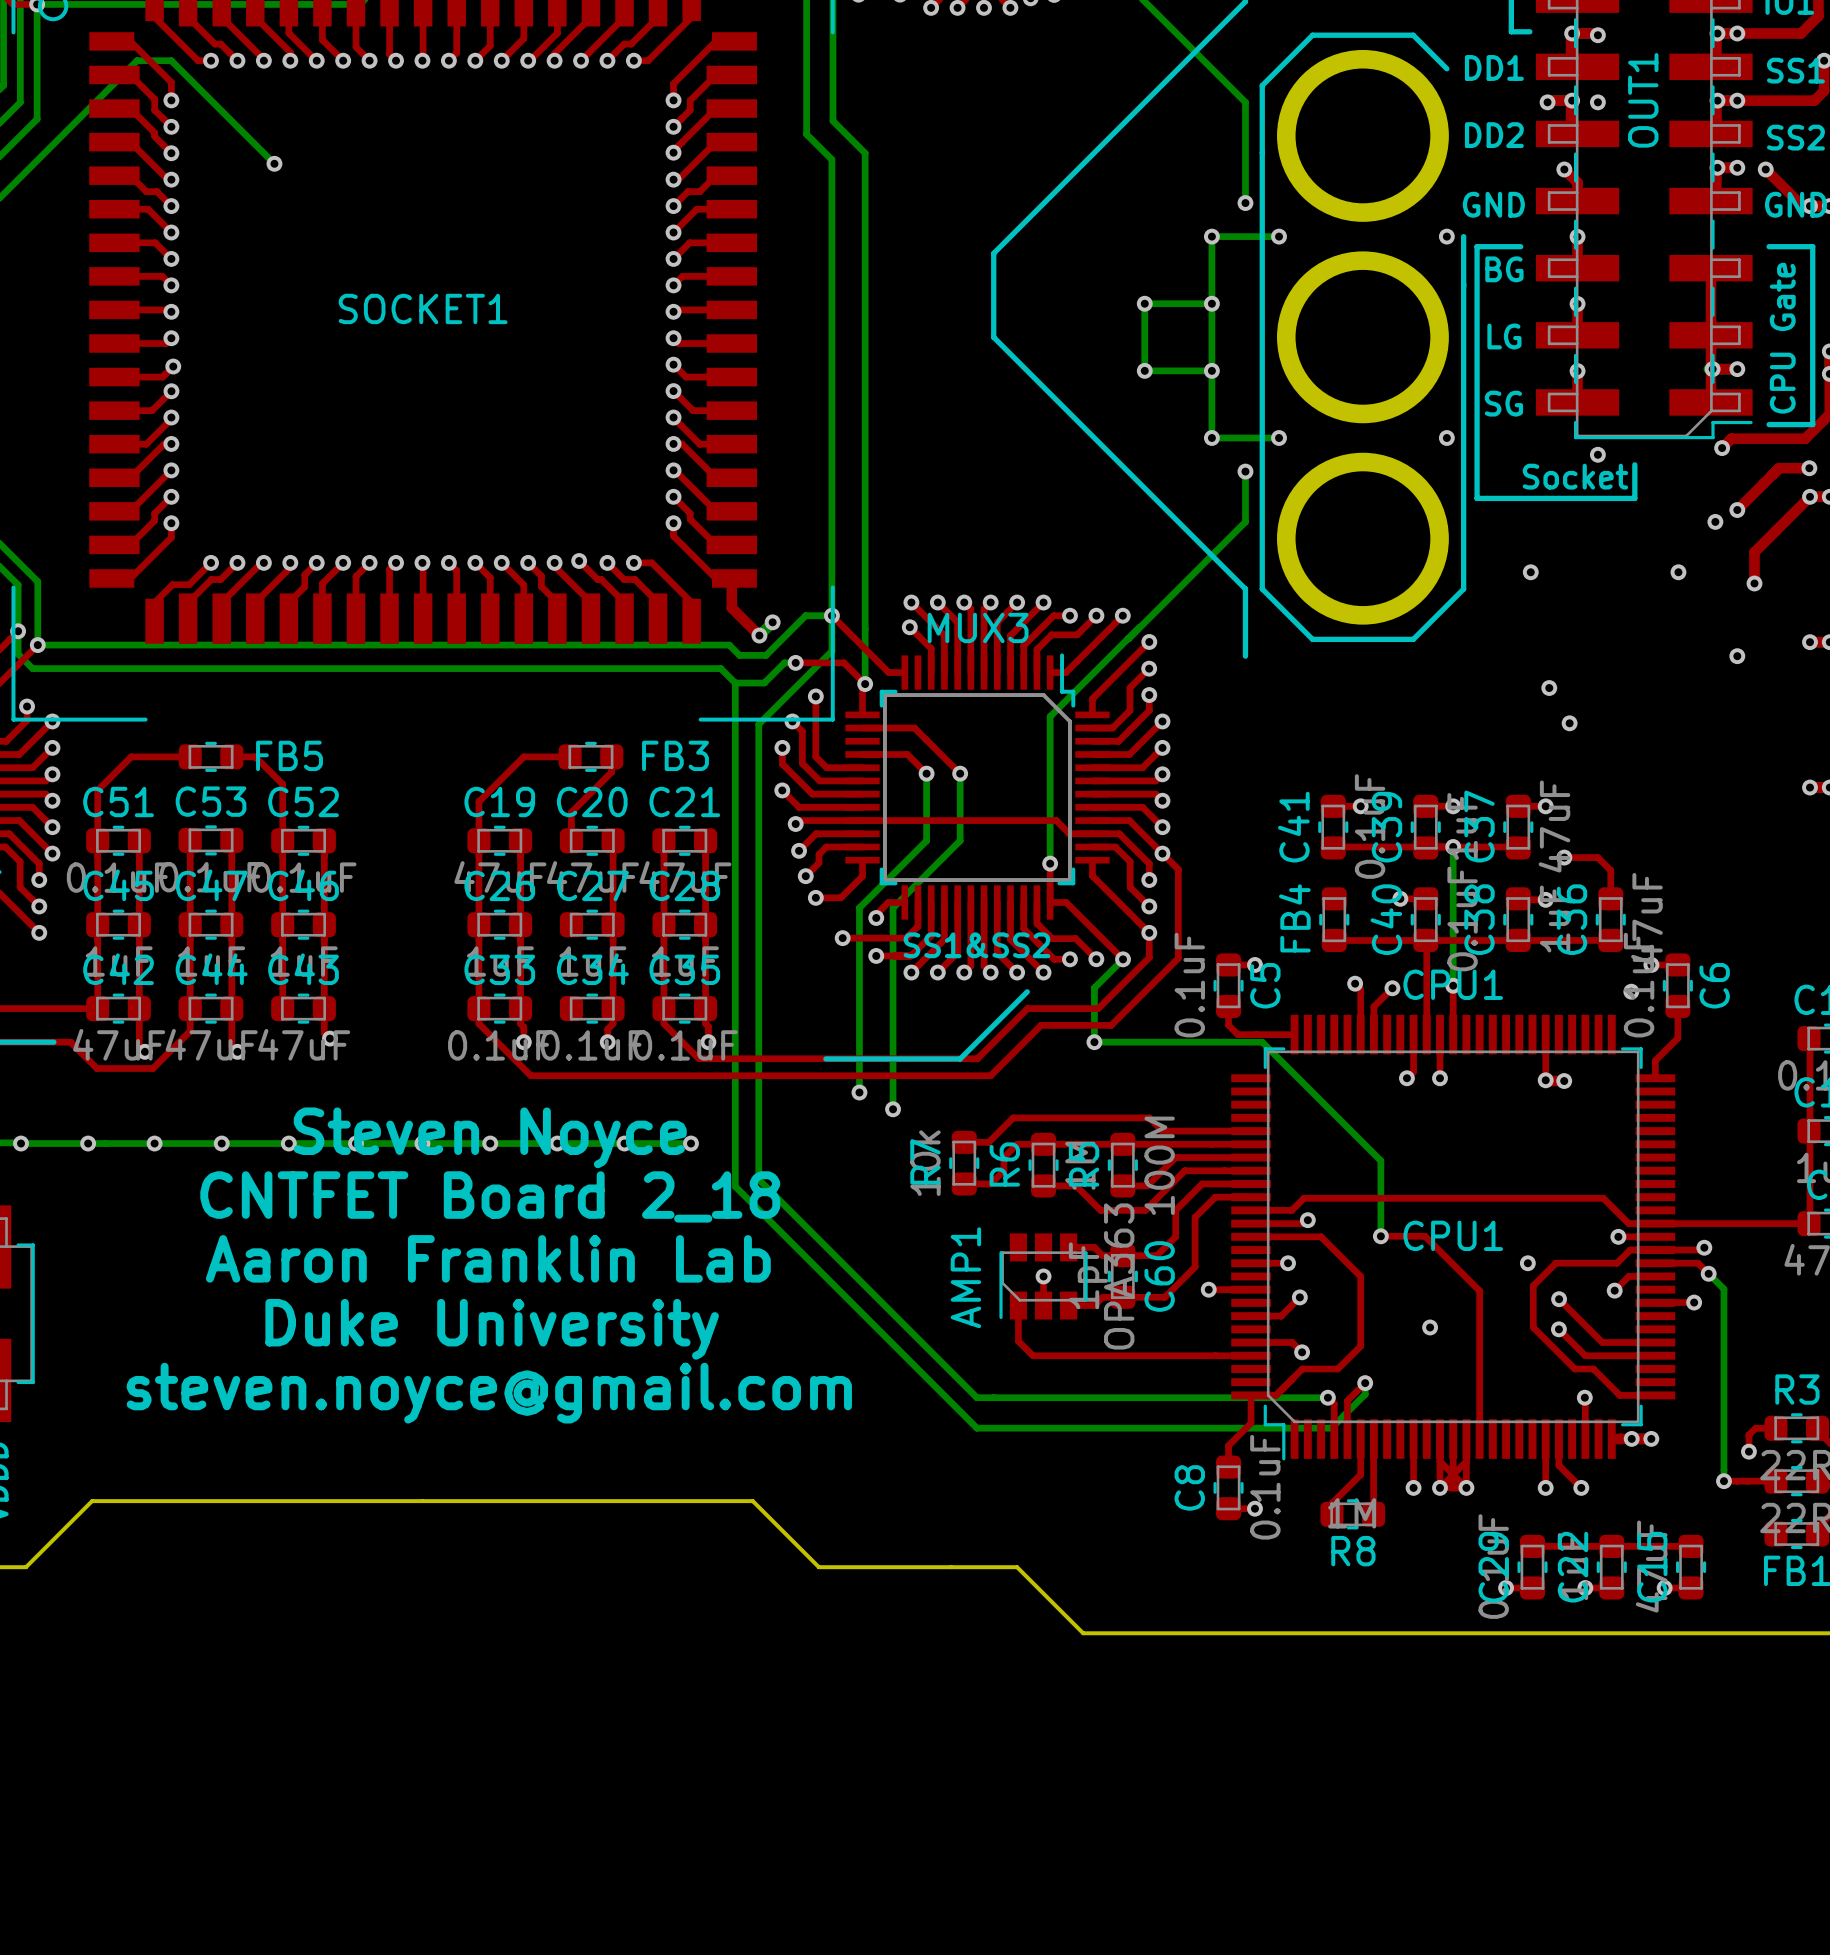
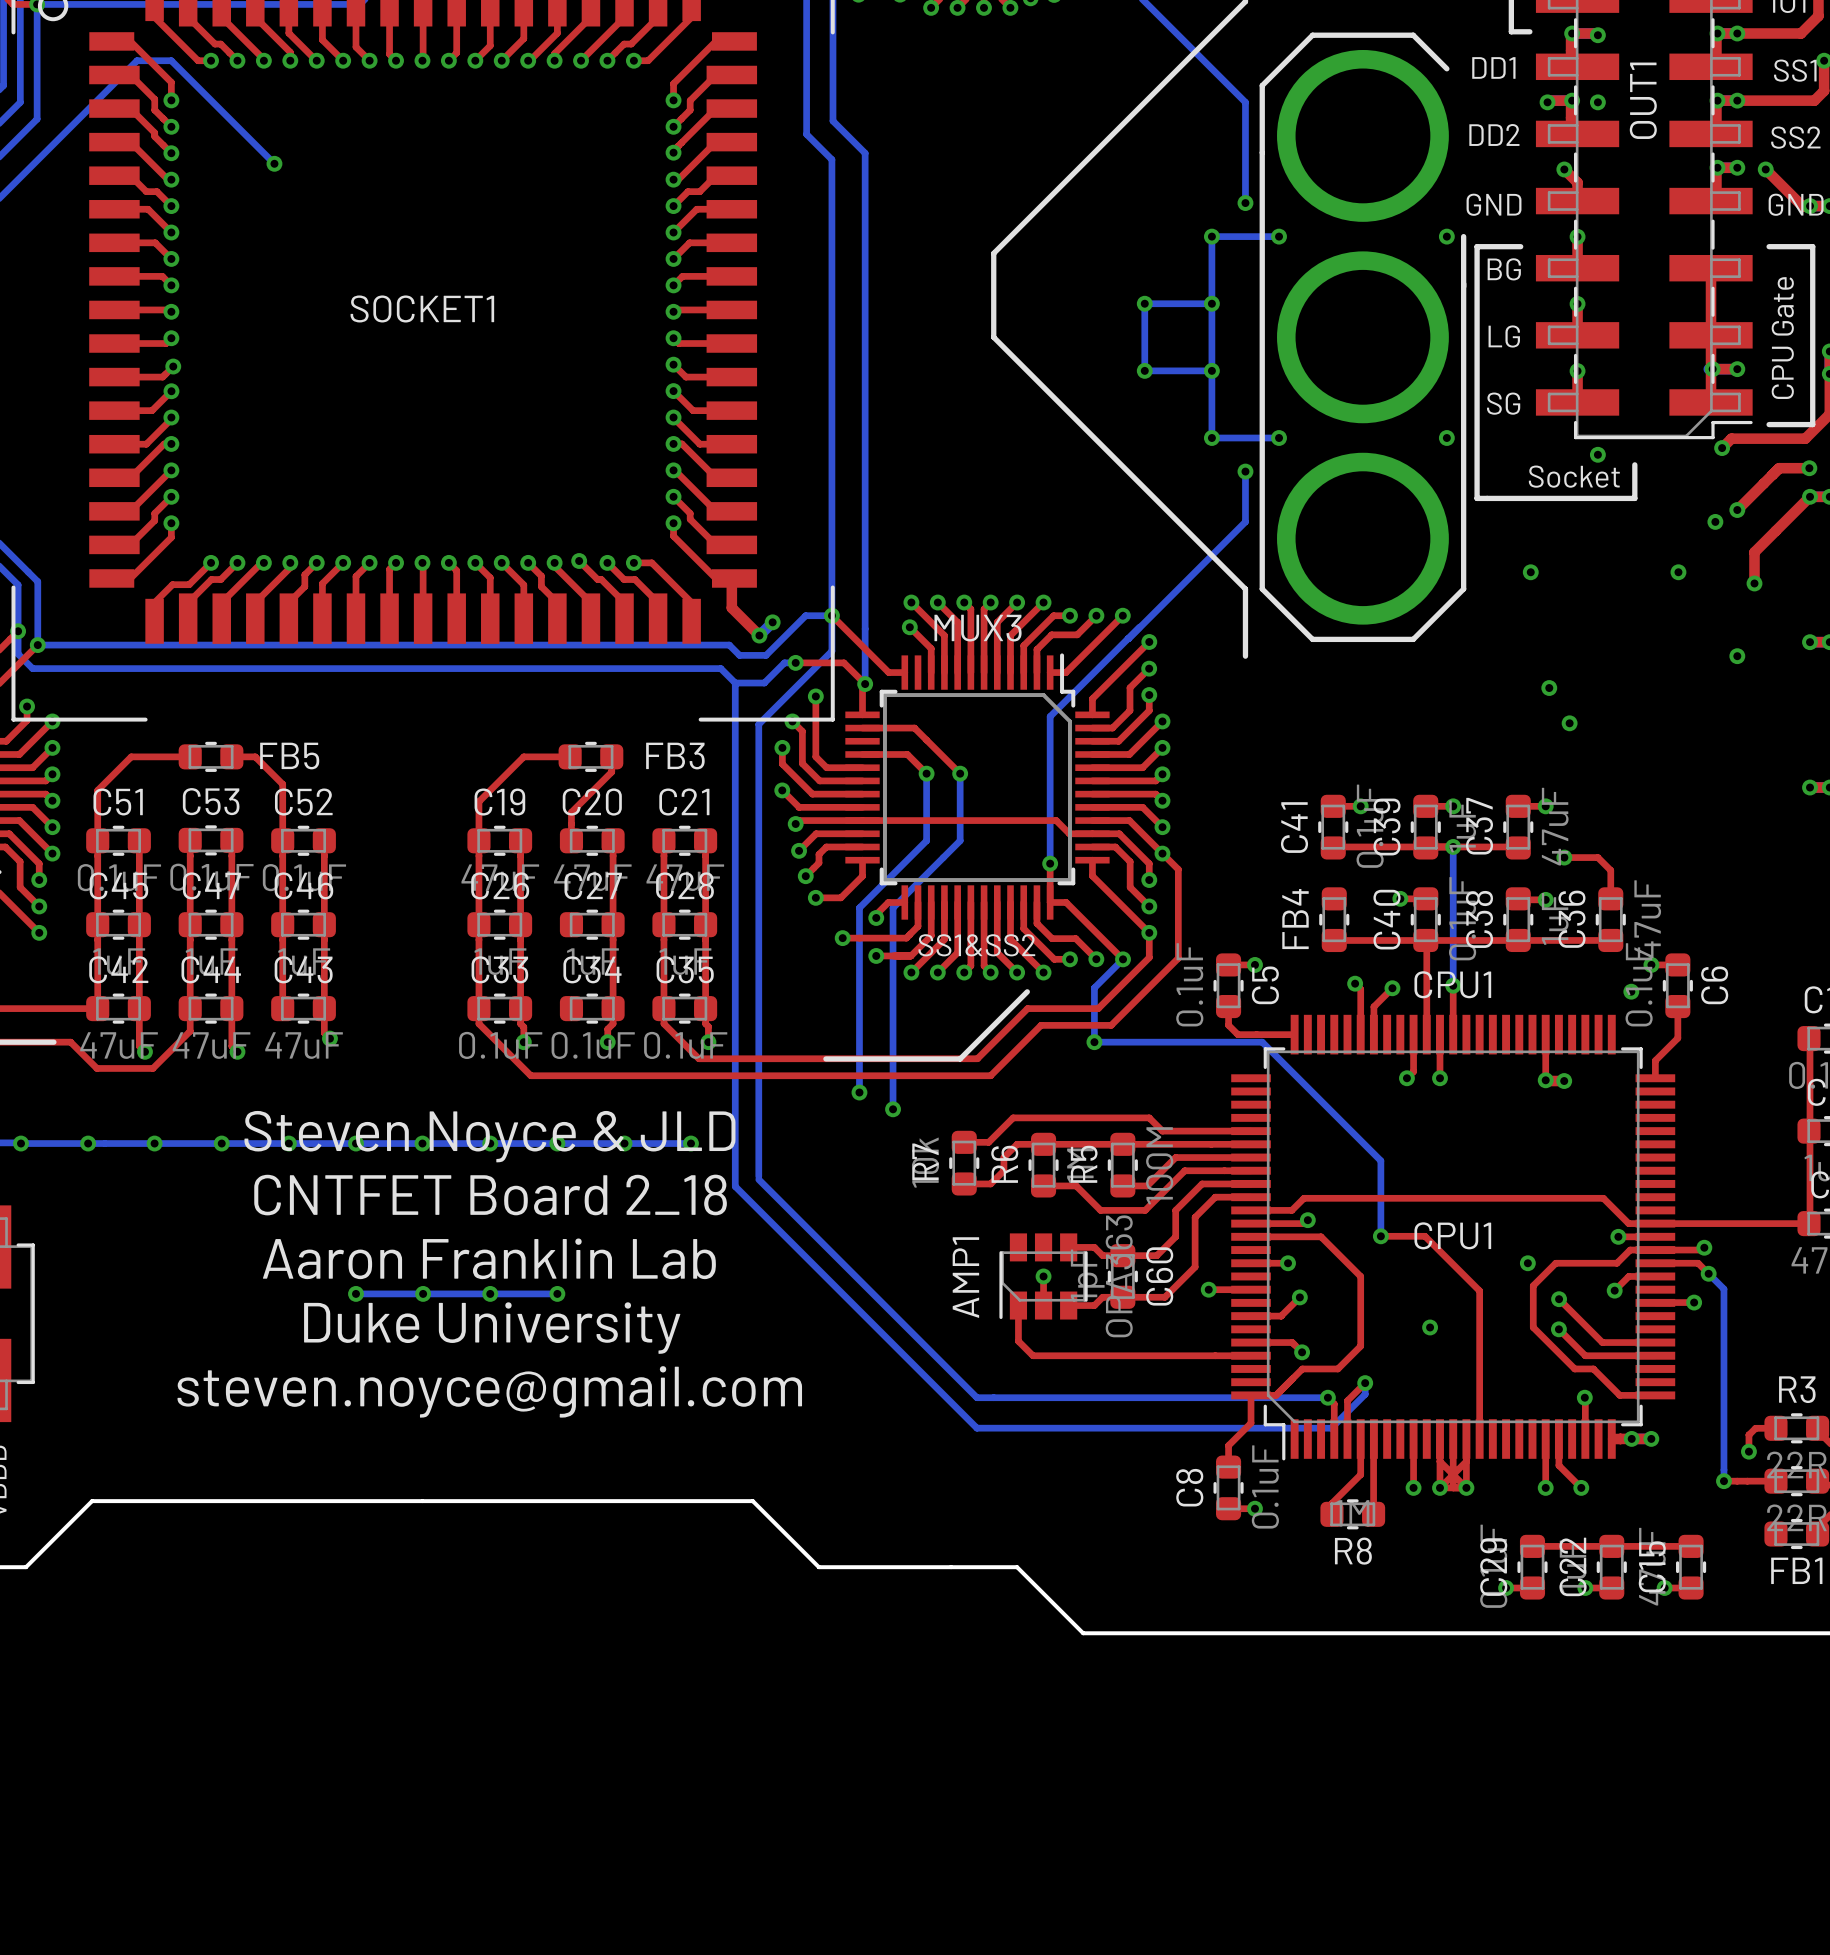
text: Steven Noyce (490, 1137) -> Steven Noyce & JLD (489, 1136)
bottom track: none -> (355, 1293) (557, 1293)
via: none -> (355, 1293)
via: none -> (423, 1293)
via: none -> (490, 1293)
via: none -> (557, 1293)

